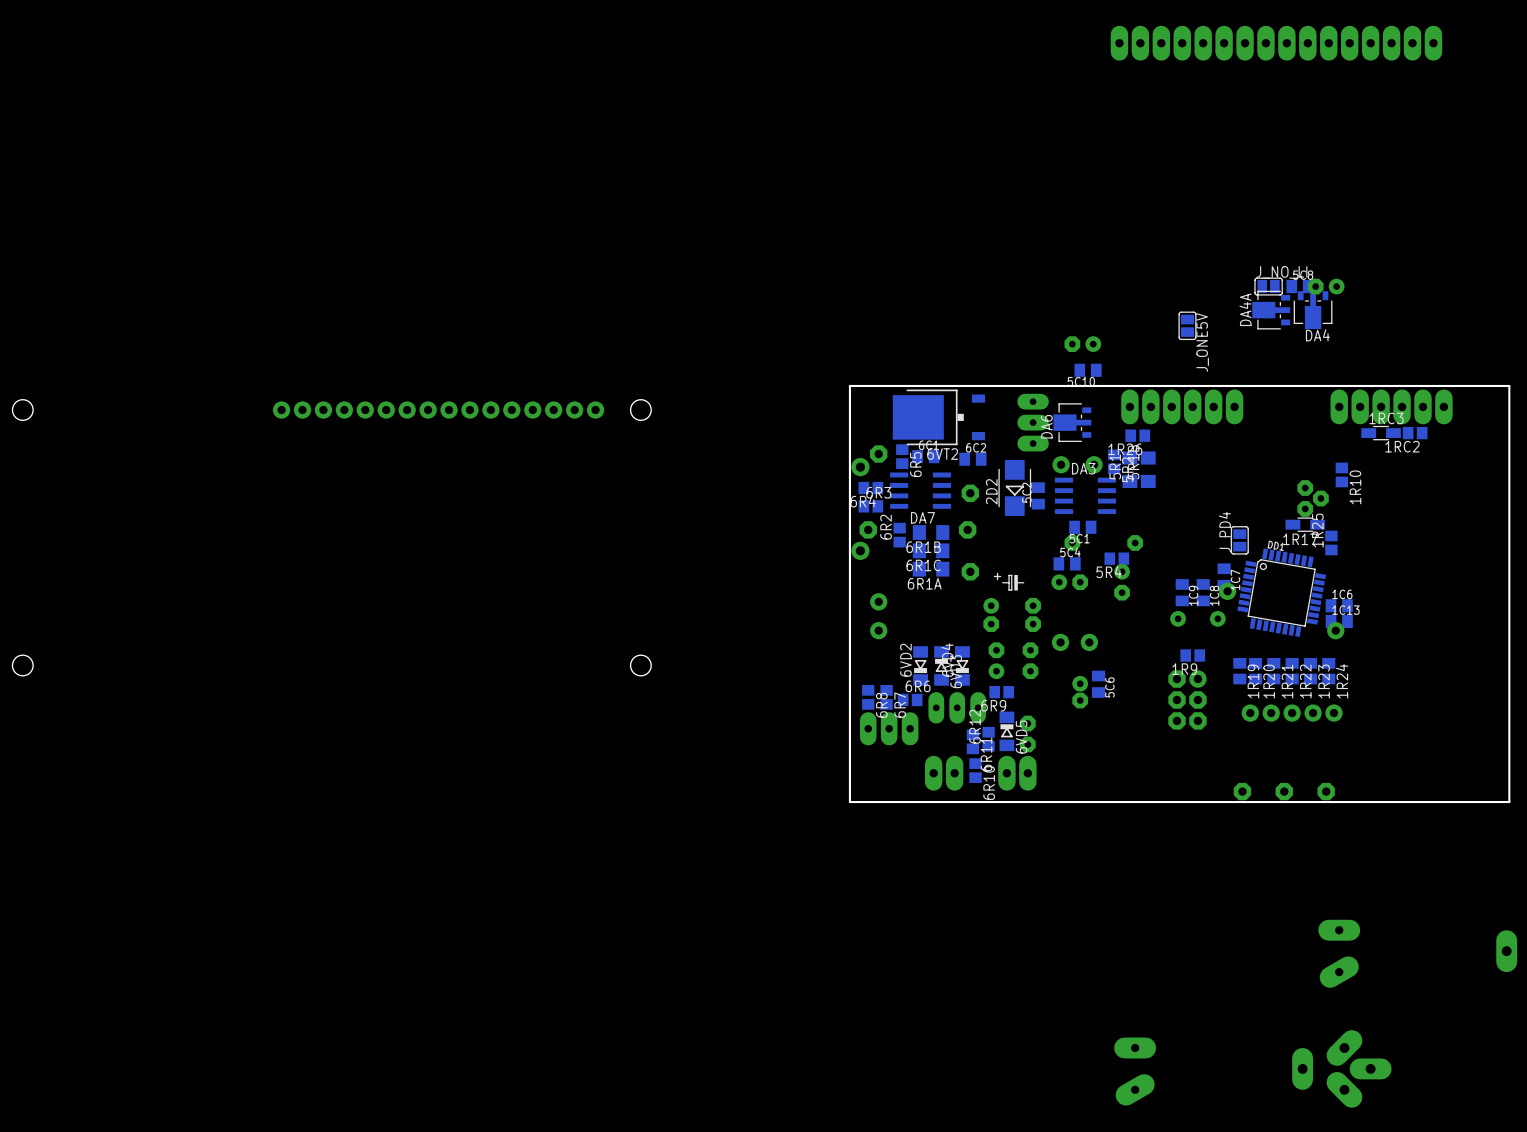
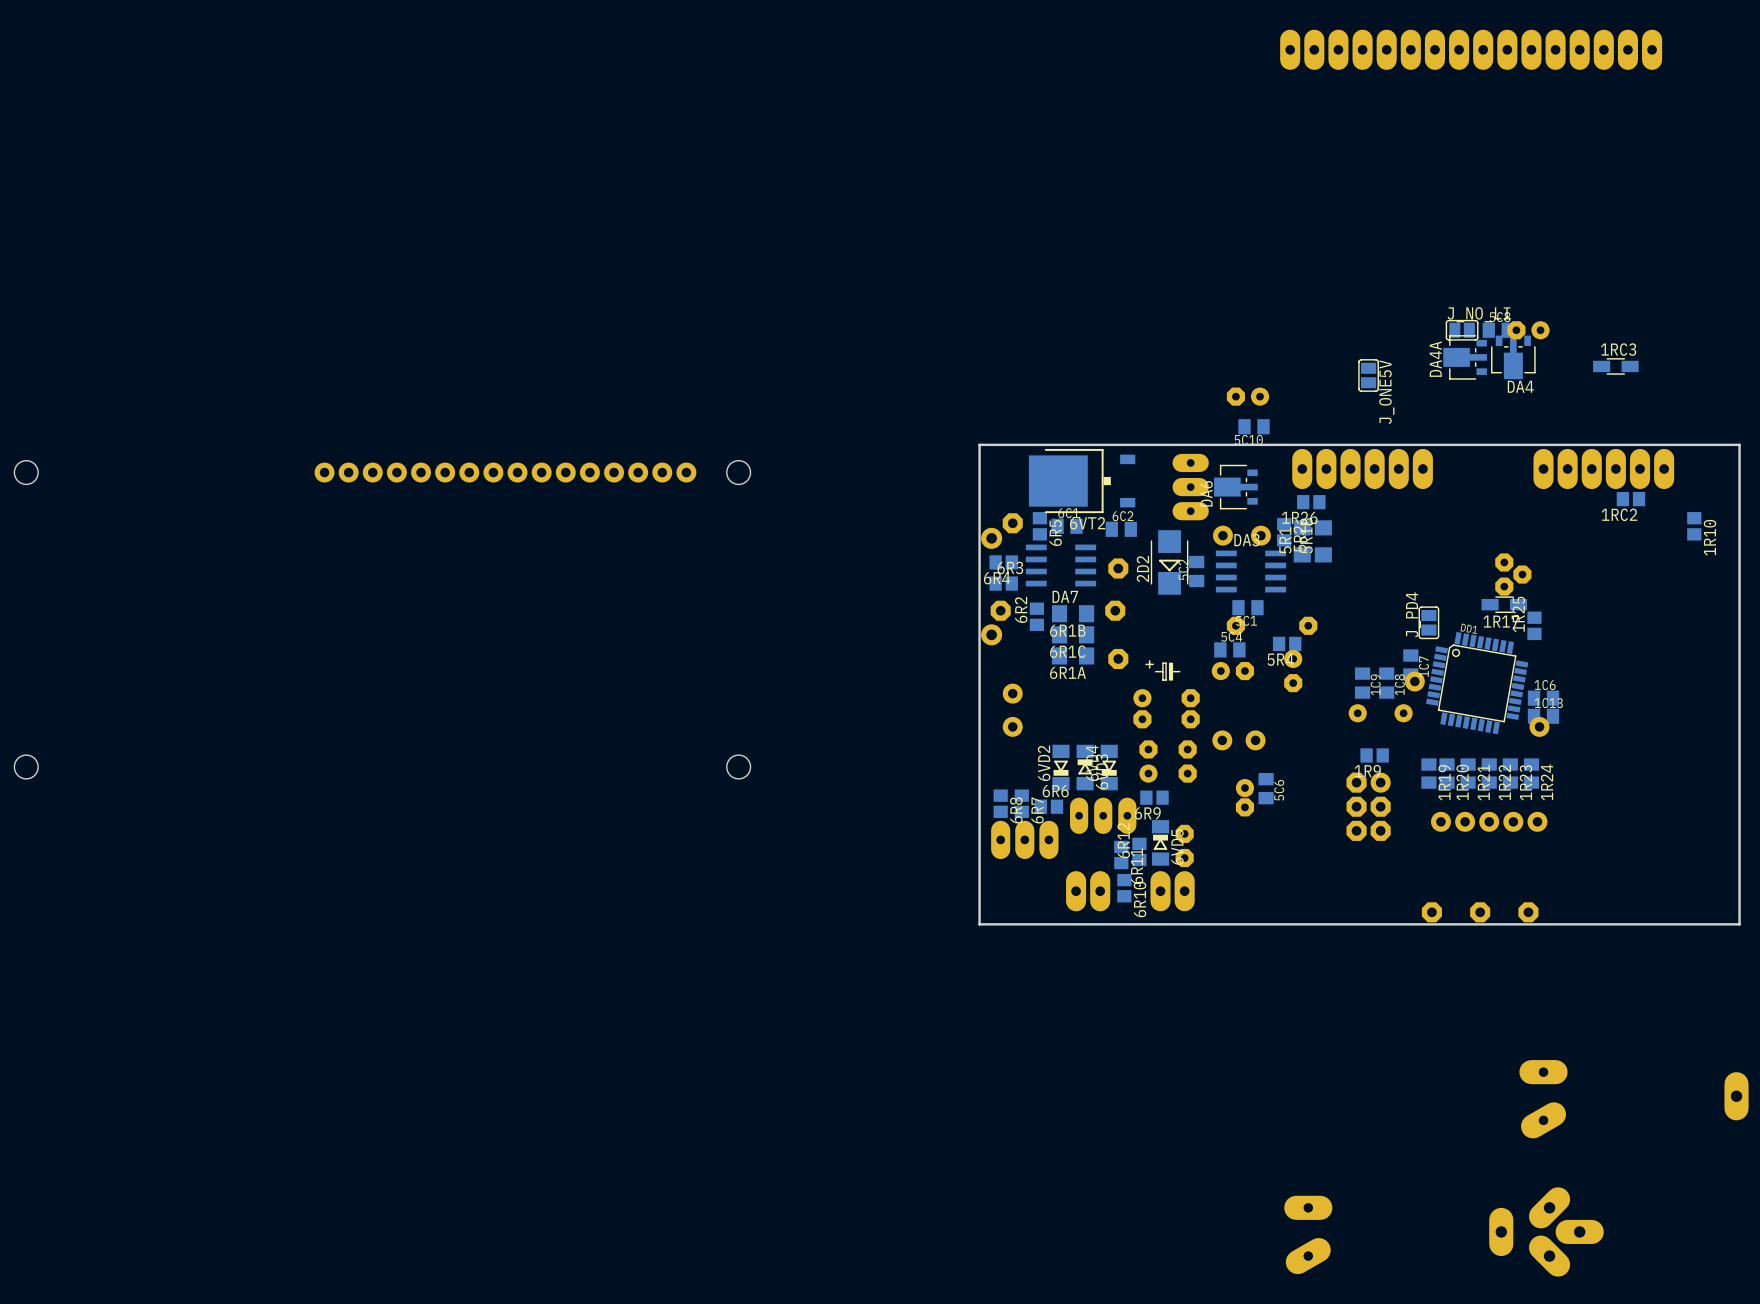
1RC3 position: (1381, 433) -> (1615, 366)
1R10 position: (1341, 474) -> (1694, 526)

